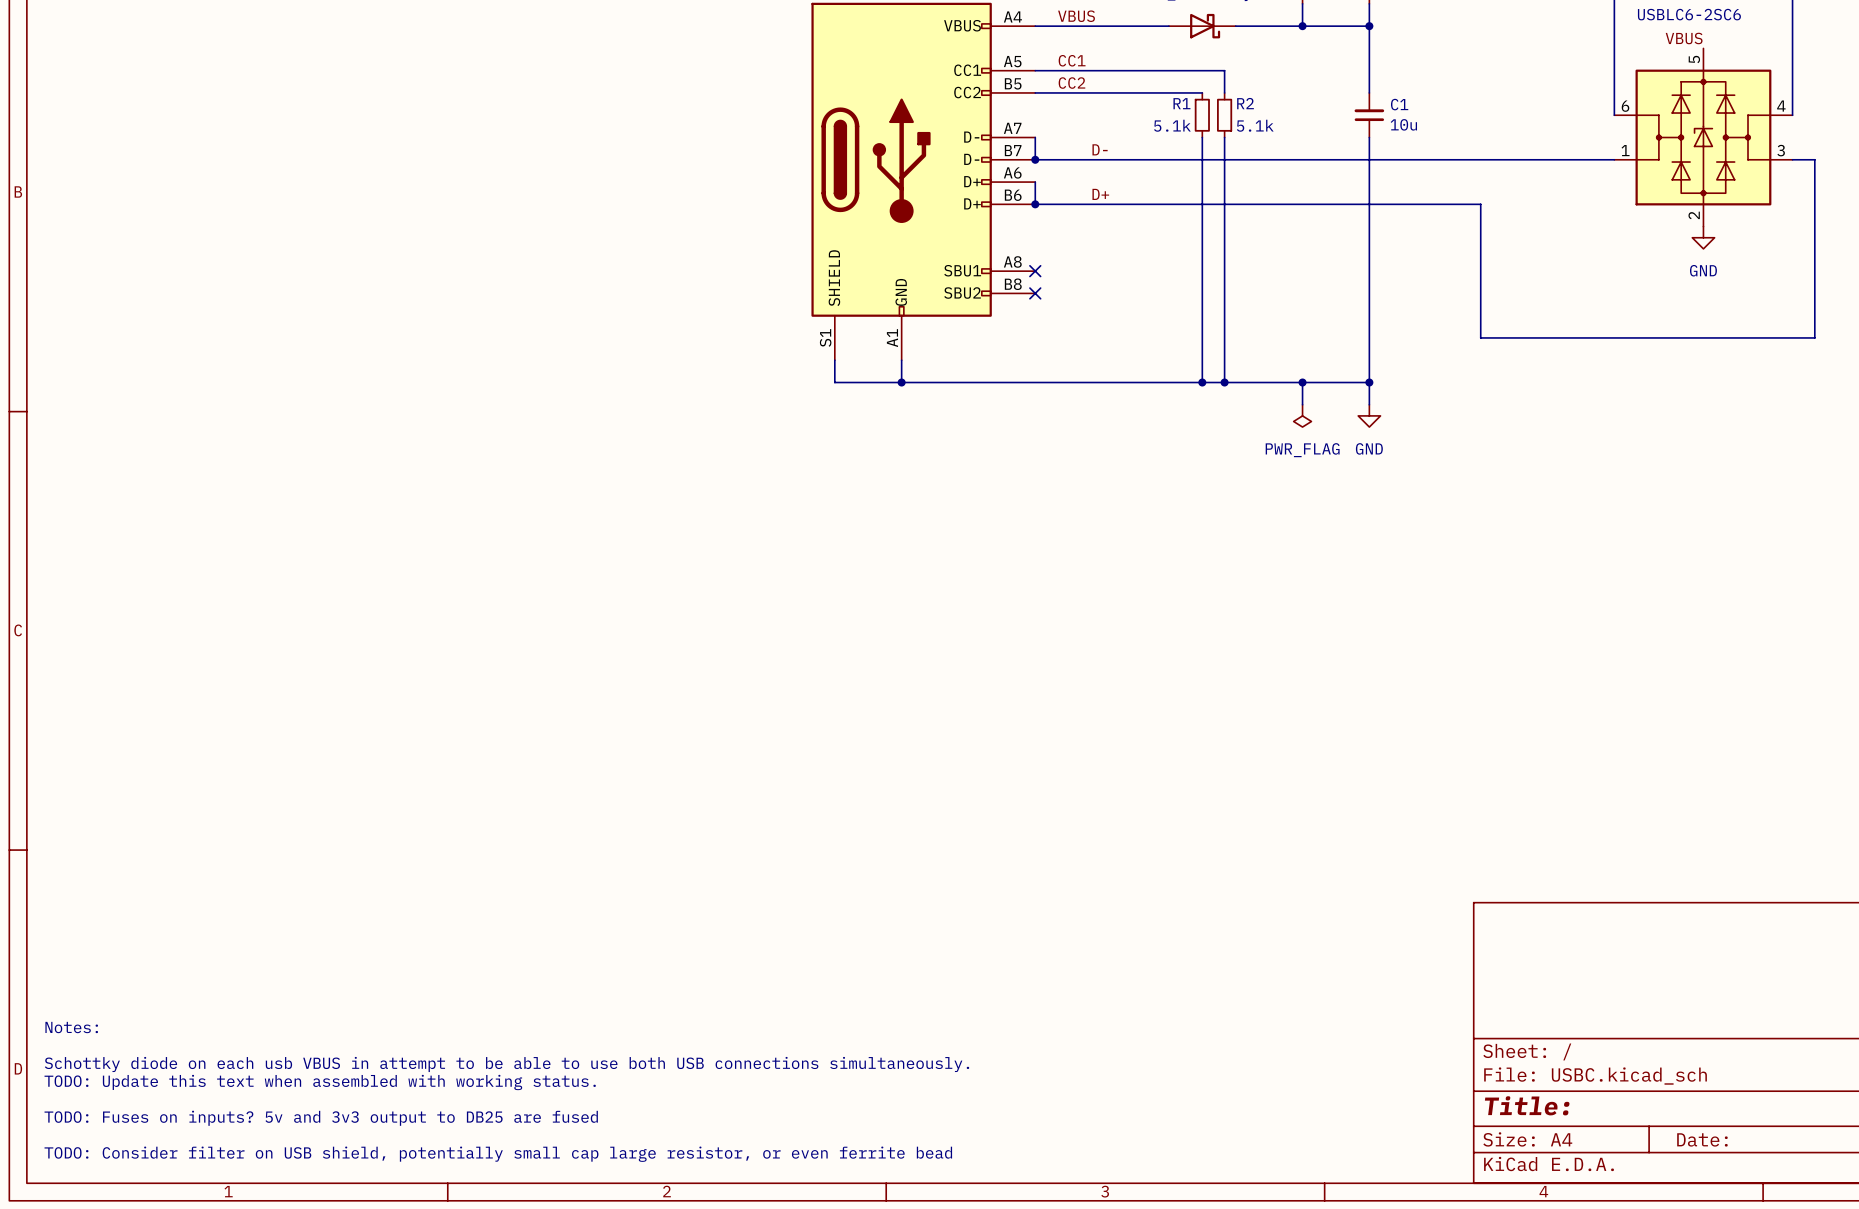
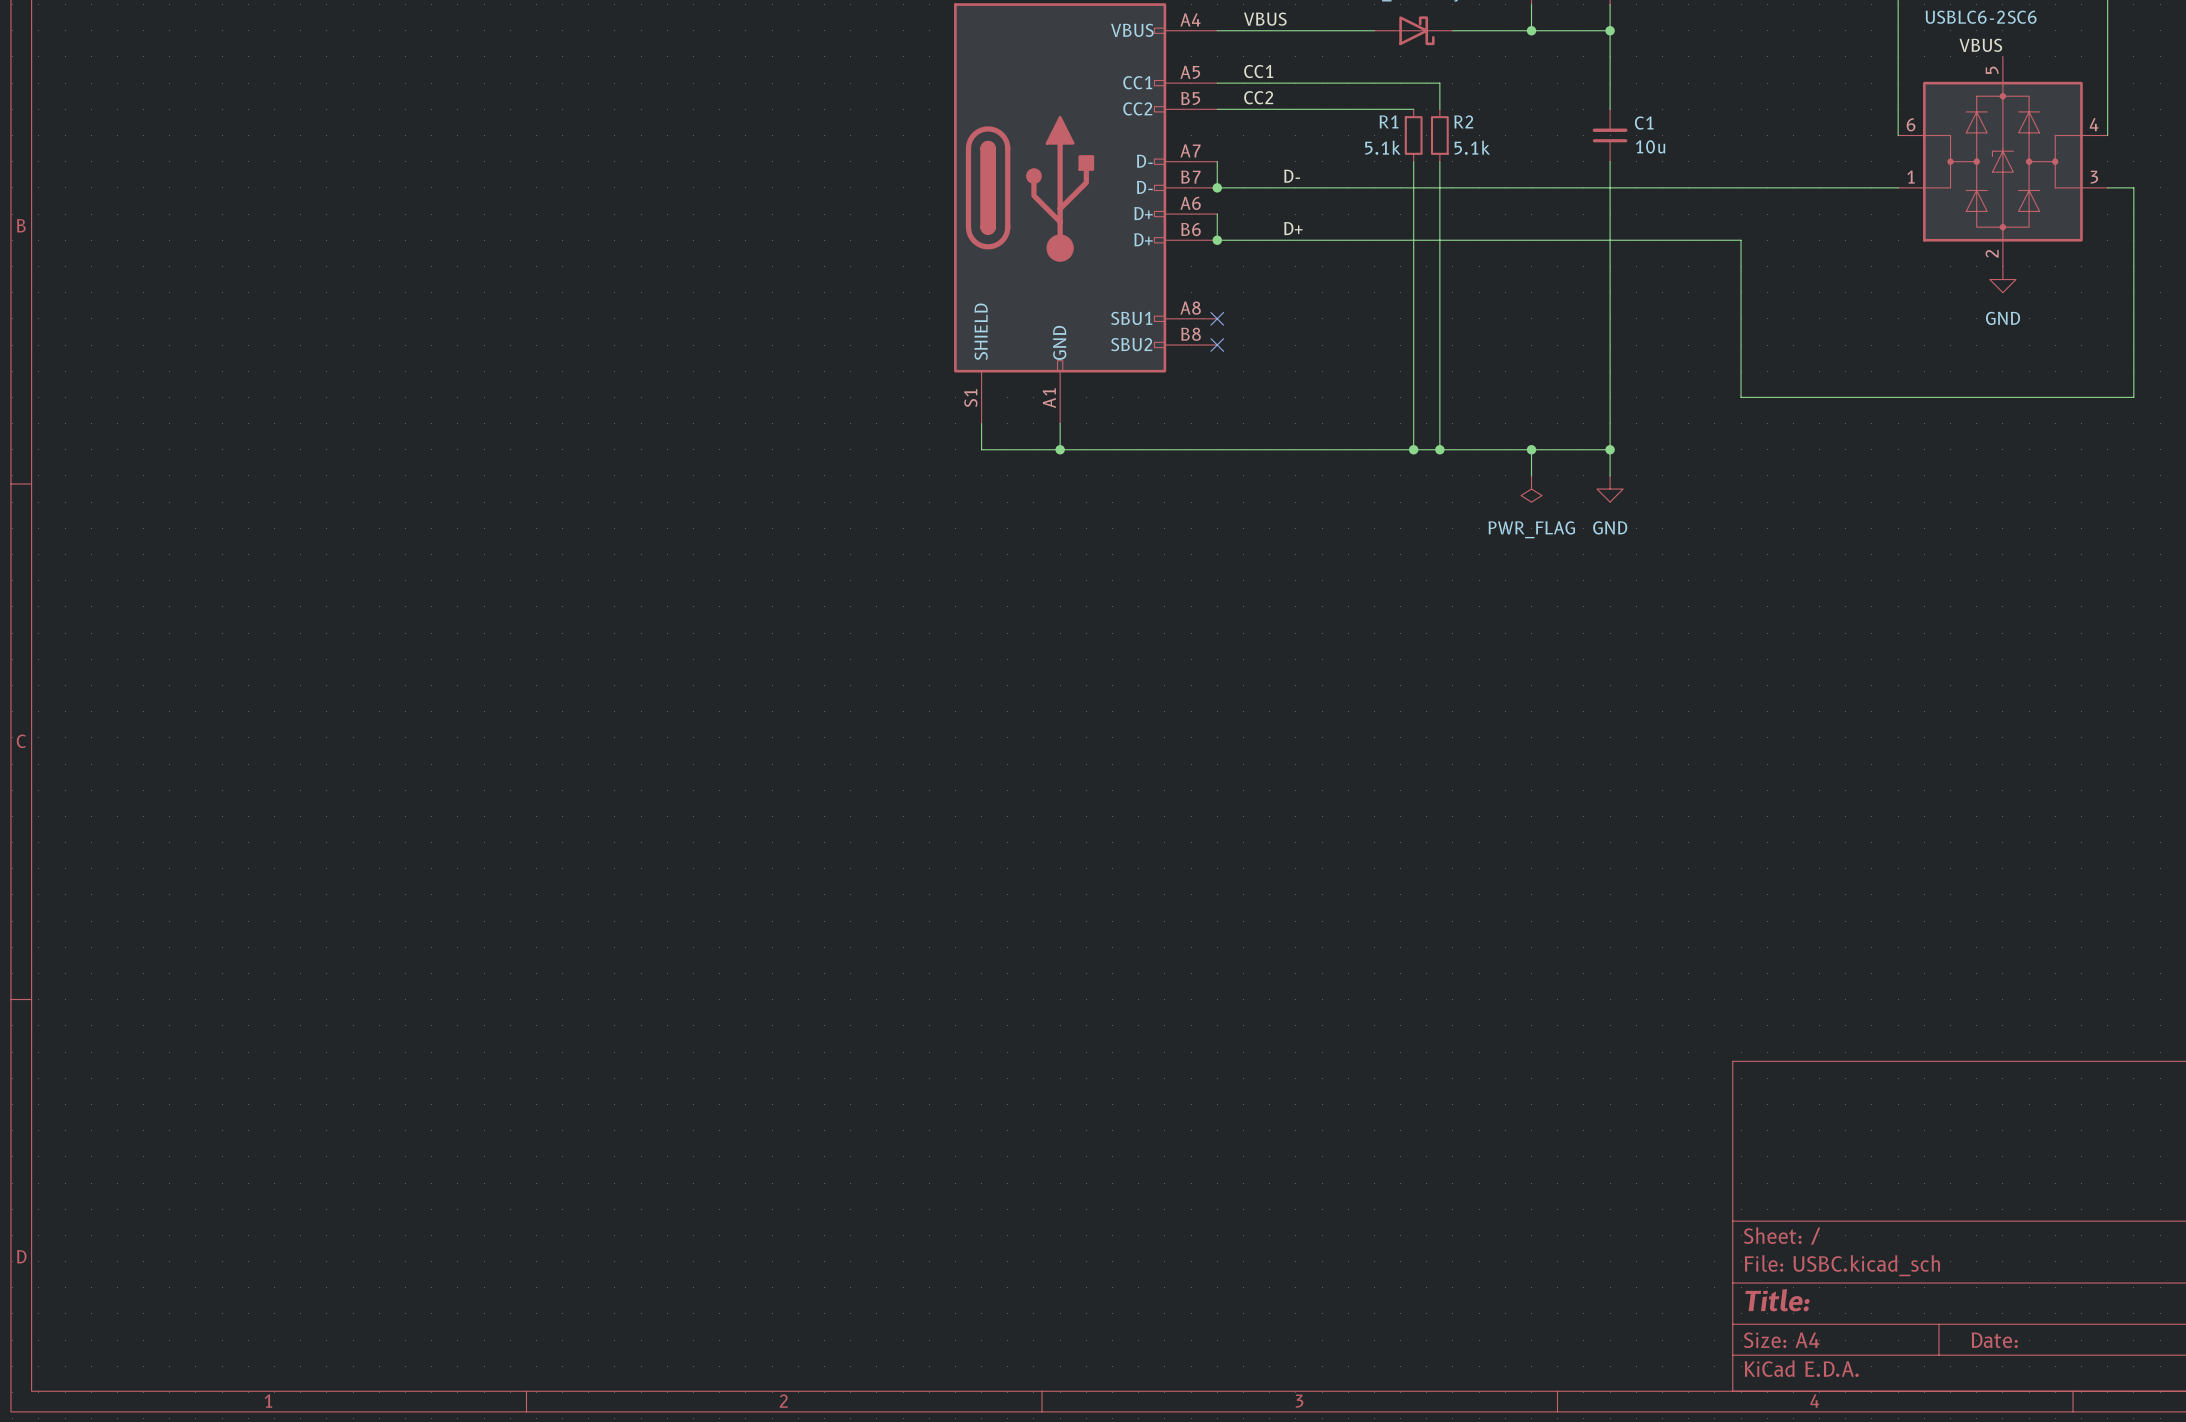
text: Notes: (71, 1027) -> none
text: Schottky diode on each usb VBUS in attempt to be able to use both USB connections simultaneously. (507, 1064) -> none
text: TODO: Update this text when assembled with working status. (320, 1082) -> none
text: TODO: Fuses on inputs? 5v and 3v3 output to DB25 are fused (321, 1118) -> none
text: TODO: Consider filter on USB shield, potentially small cap large resistor, or even ferrite bead (498, 1154) -> none

